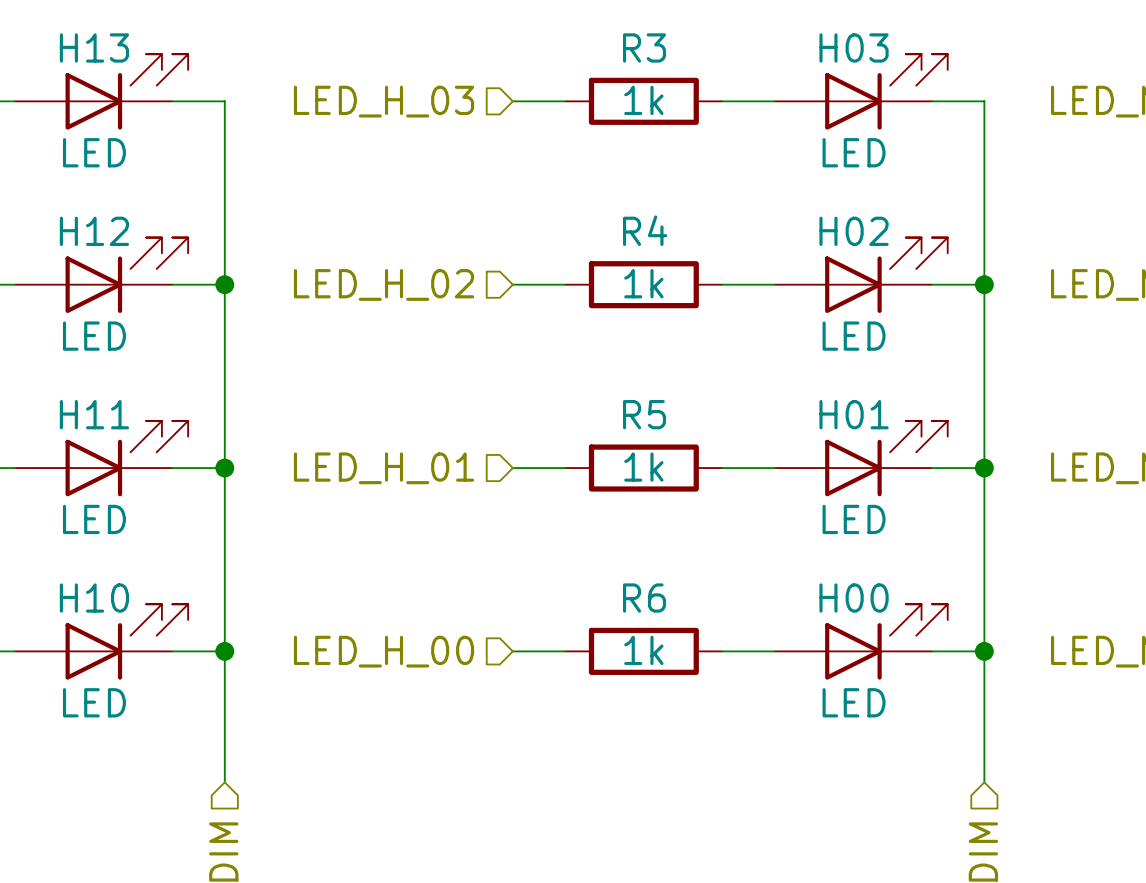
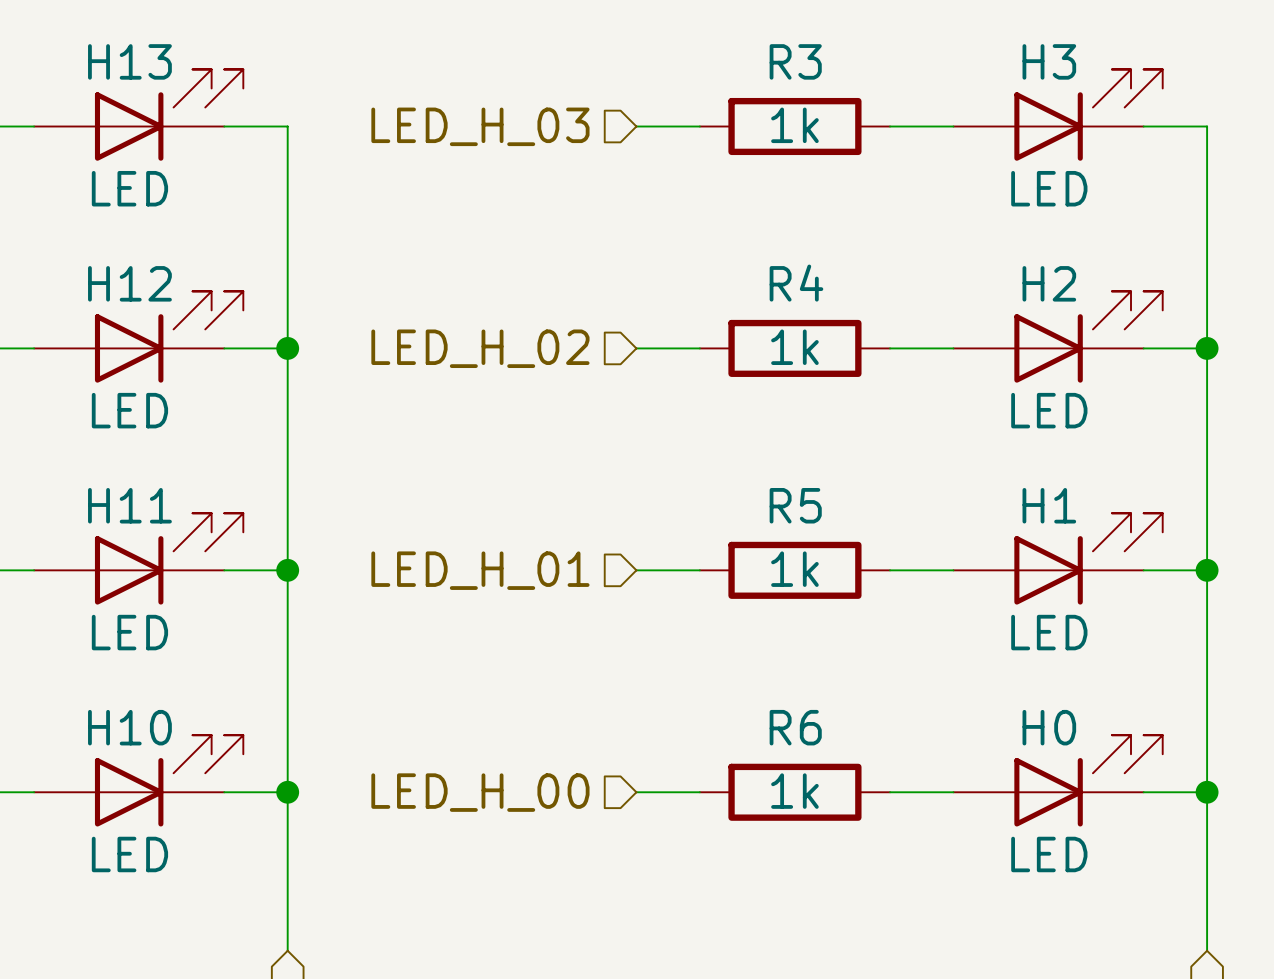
H03 name: H03 (854, 47) -> H3 (1049, 61)
H02 name: H02 (854, 231) -> H2 (1049, 283)
H01 name: H01 (854, 414) -> H1 (1049, 505)
H00 name: H00 (854, 598) -> H0 (1049, 727)

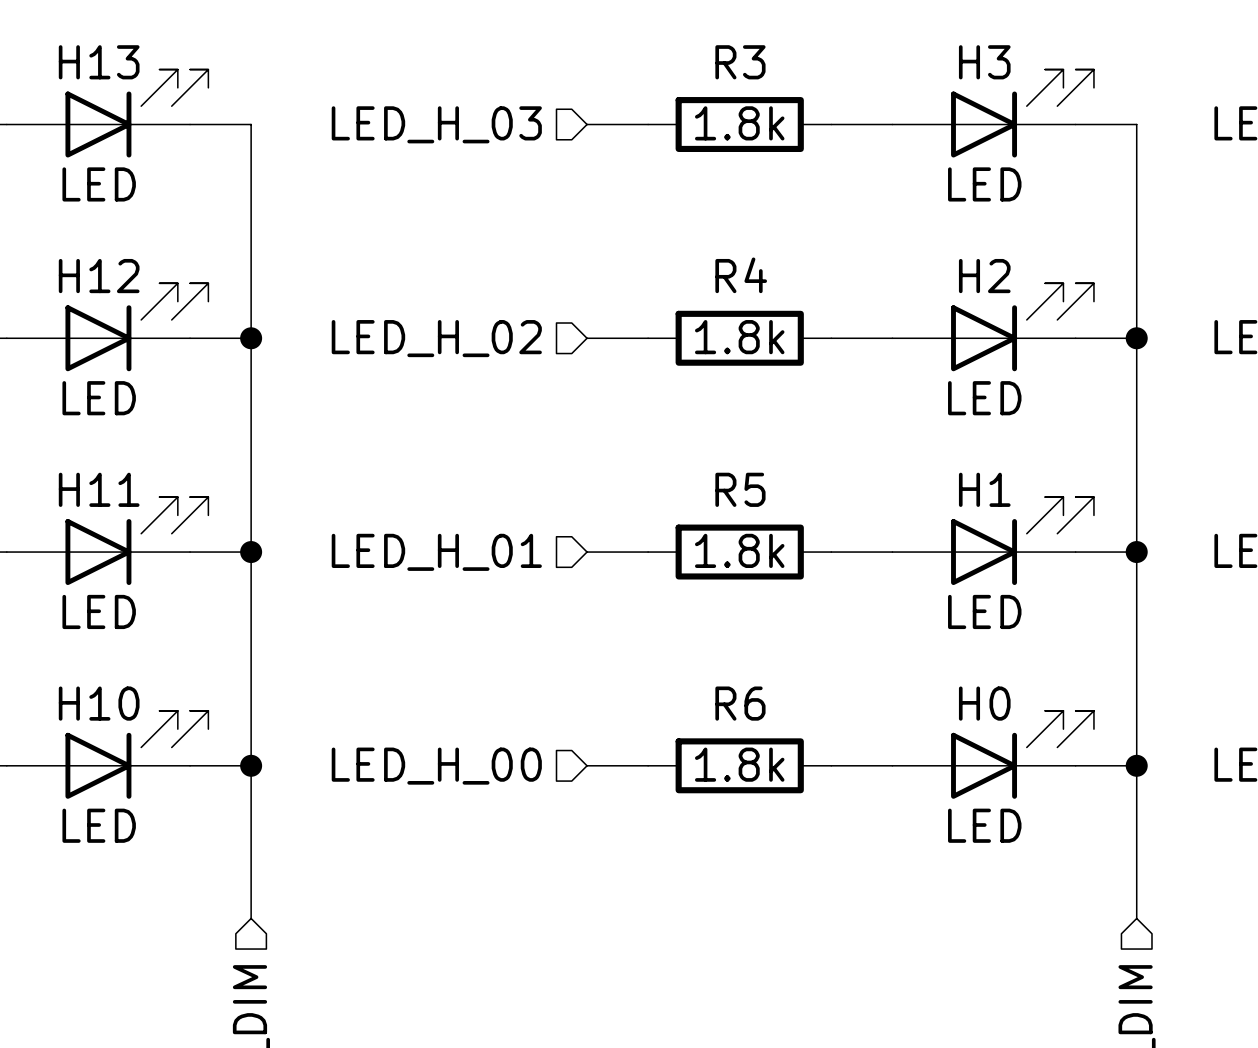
R3 value: 1k (794, 125) -> 1.8k (739, 123)
R4 value: 1k (794, 347) -> 1.8k (739, 337)
R5 value: 1k (794, 569) -> 1.8k (739, 550)
R6 value: 1k (794, 791) -> 1.8k (739, 764)

